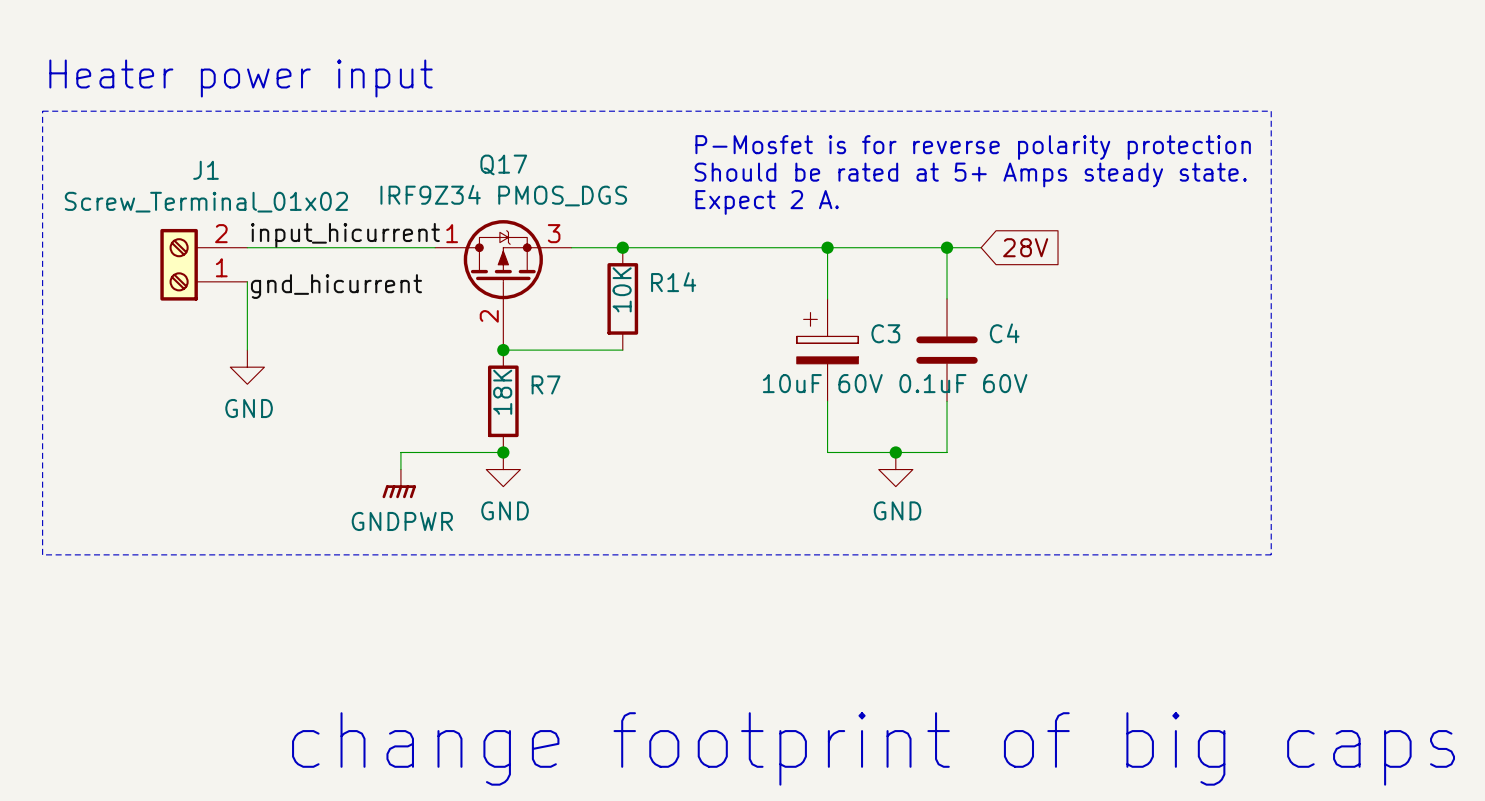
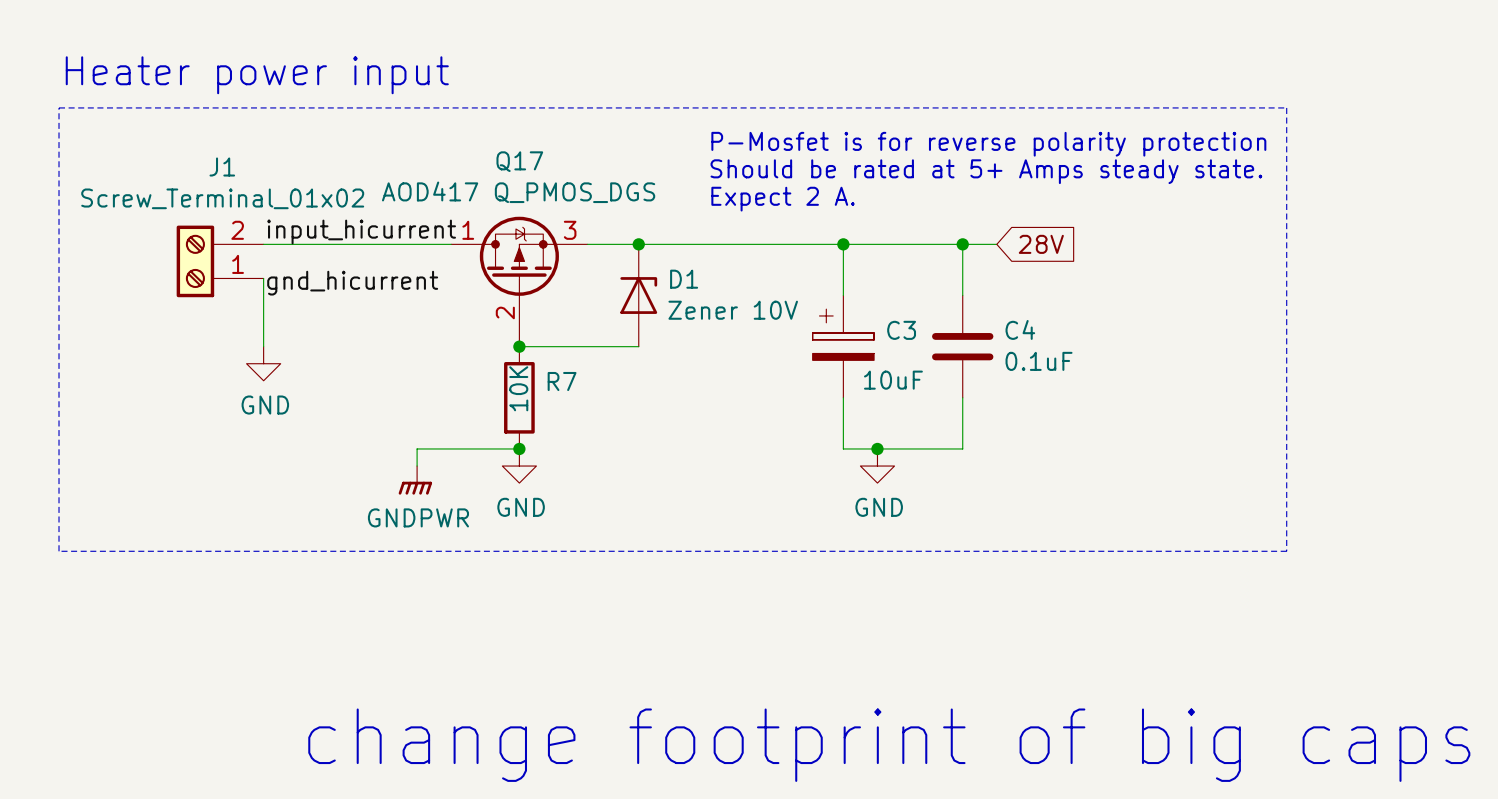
Q17 value: IRF9Z34 PMOS_DGS (503, 195) -> AOD417 Q_PMOS_DGS (518, 192)
R14: 10K (622, 298) -> none
D1: none -> Zener 10V (638, 295)
C3 value: 10uF 60V (822, 383) -> 10uF (893, 380)
C4 value: 0.1uF 60V (963, 383) -> 0.1uF (1039, 361)
R7 value: 18K (502, 392) -> 10K (518, 388)
junction position: (895, 452) -> (877, 448)
power symbol position: GND (895, 469) -> GND (877, 466)

